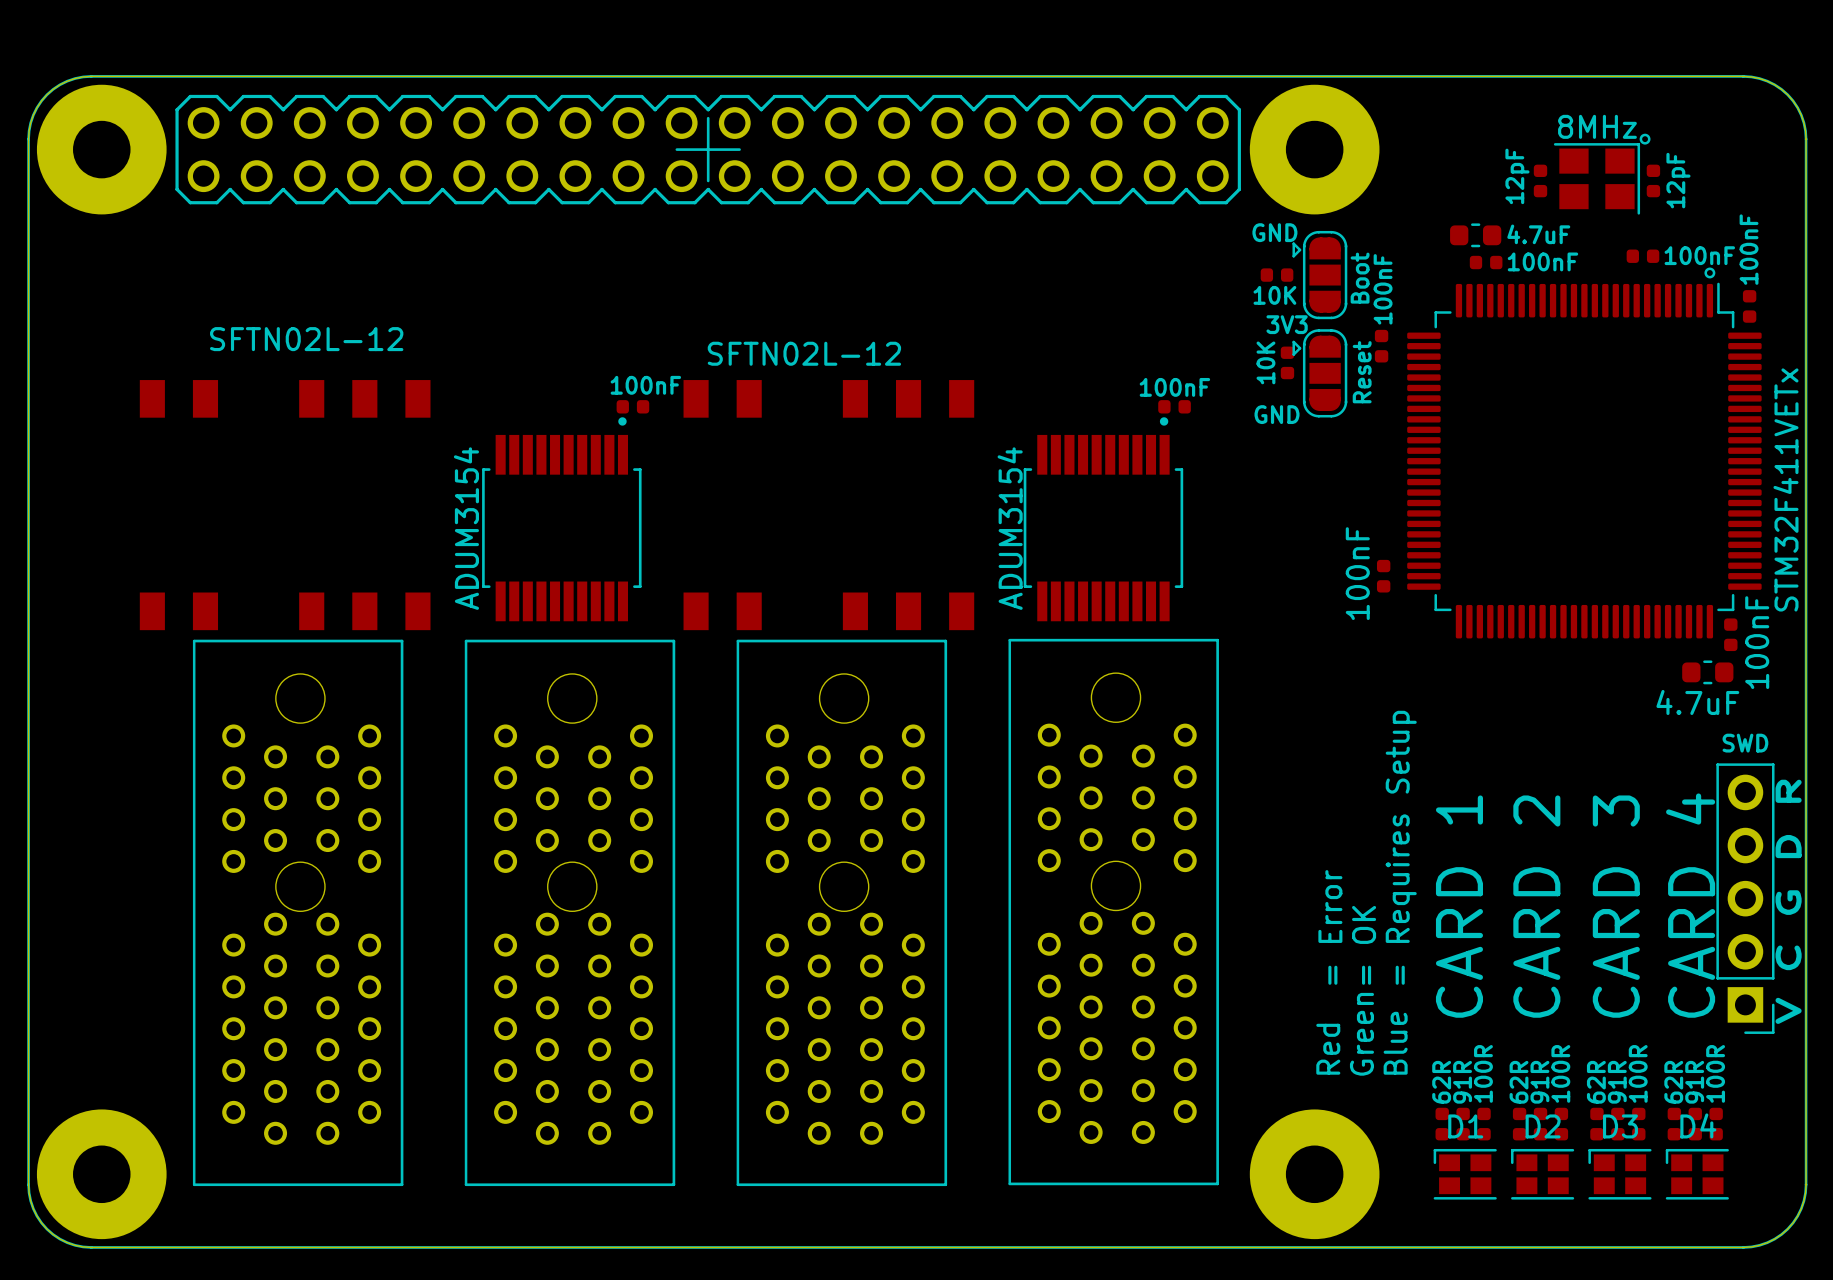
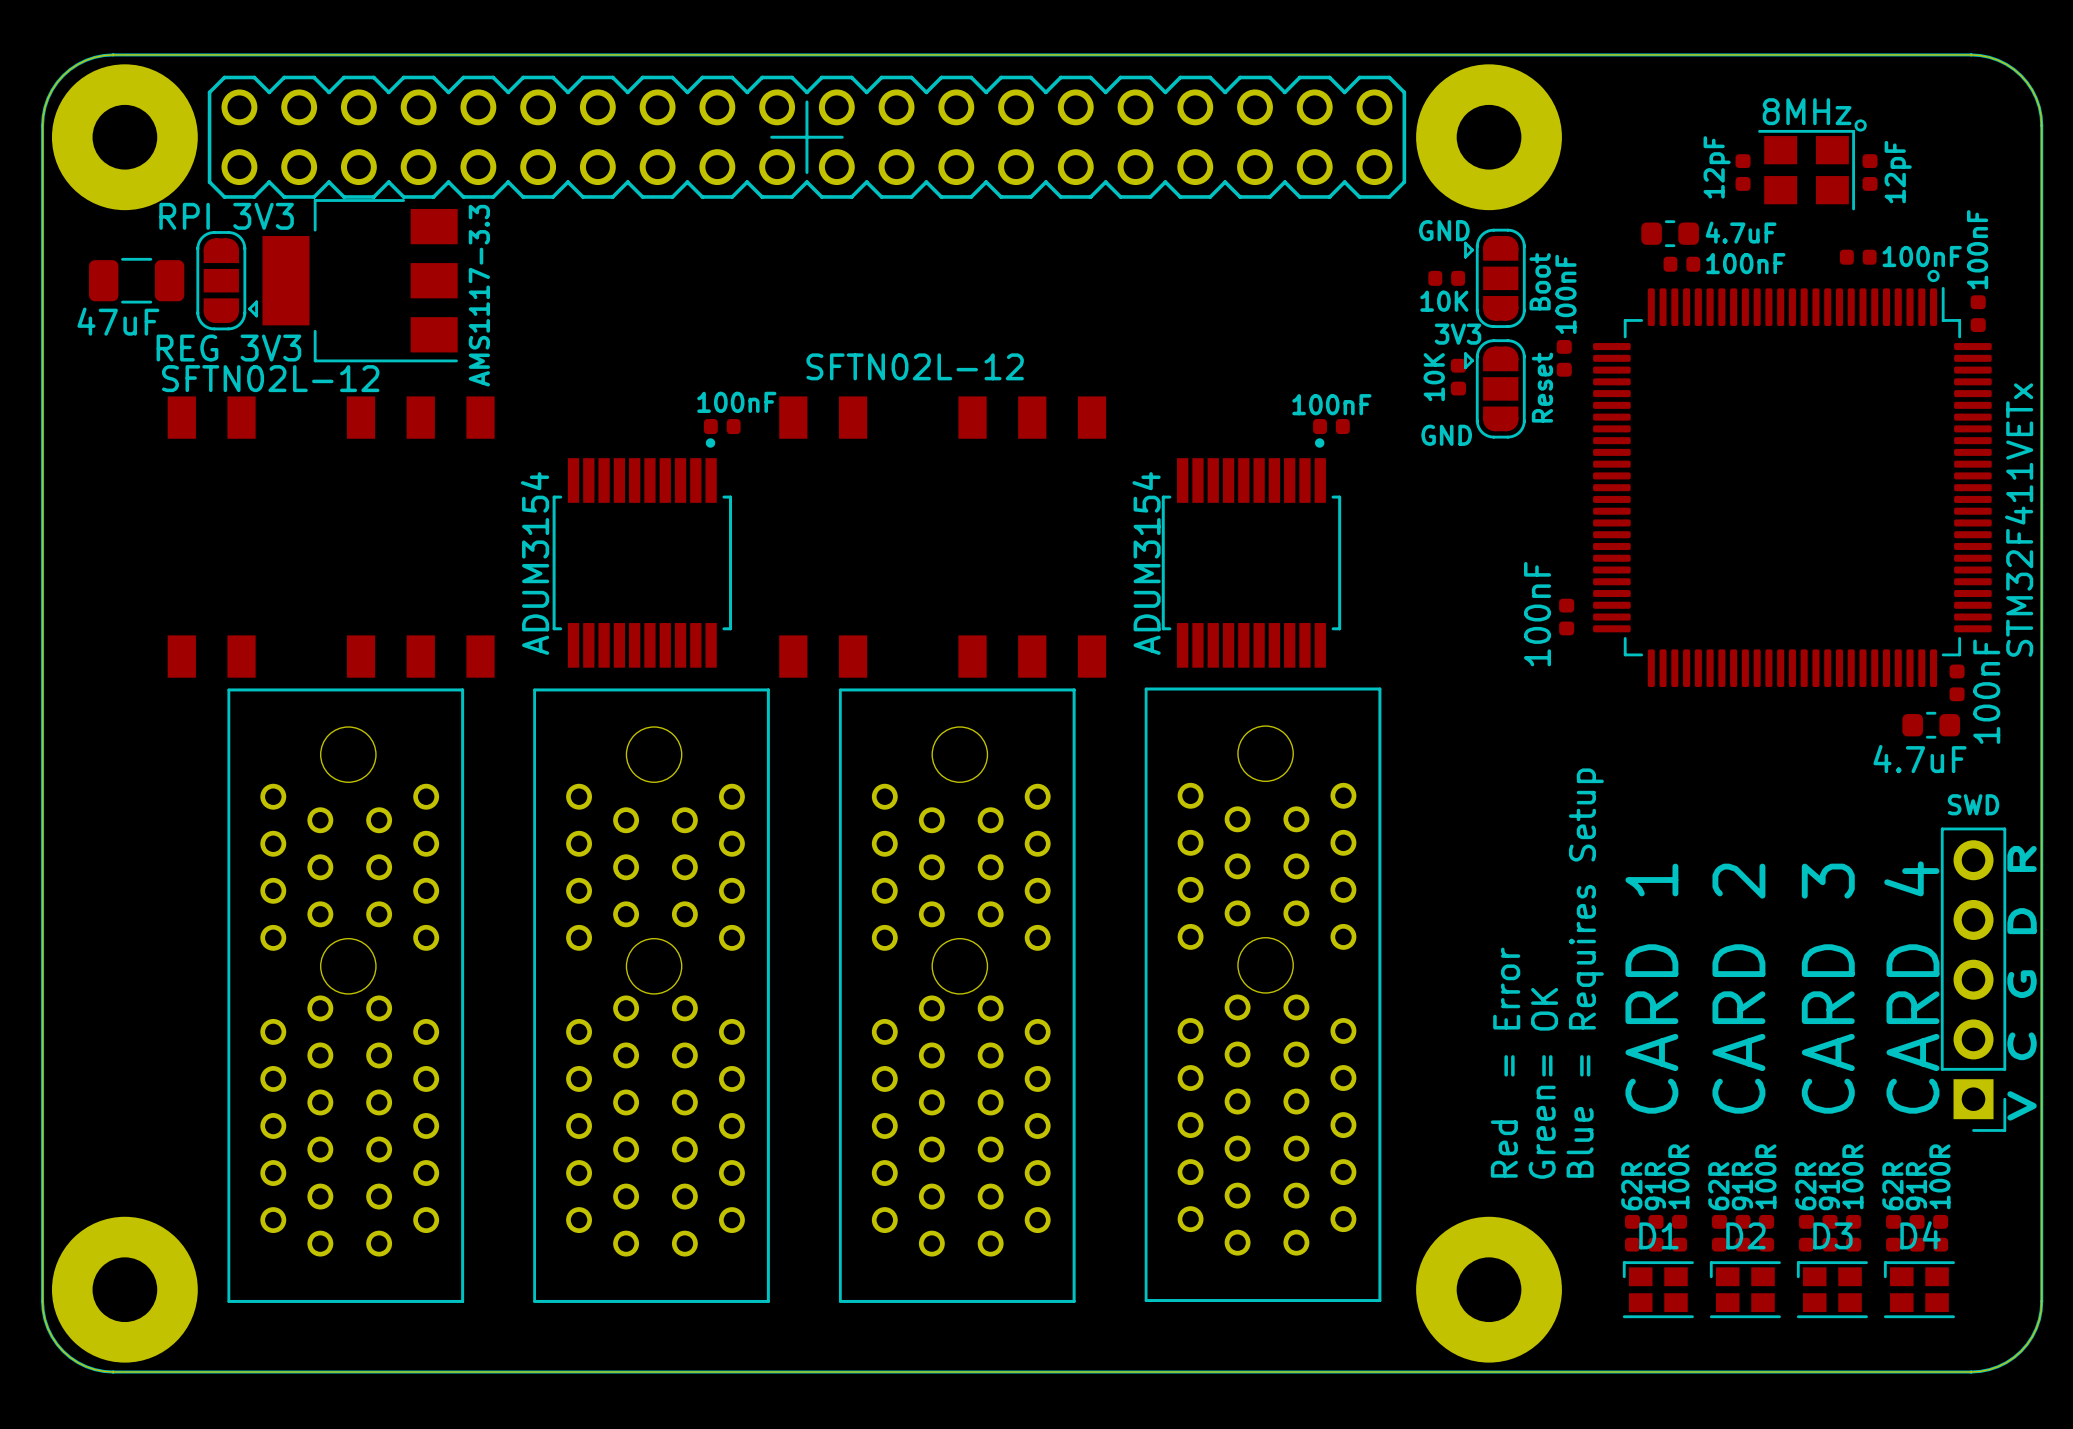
text: none -> RPI 3V3 (226, 216)
part: none -> 47uF (136, 280)
part: none -> (227, 280)
part: none -> AMS1117-3.3 (360, 280)
text: none -> REG 3V3 (228, 348)
part value position: SFTN02L-12 (306, 339) -> SFTN02L-12 (270, 378)

